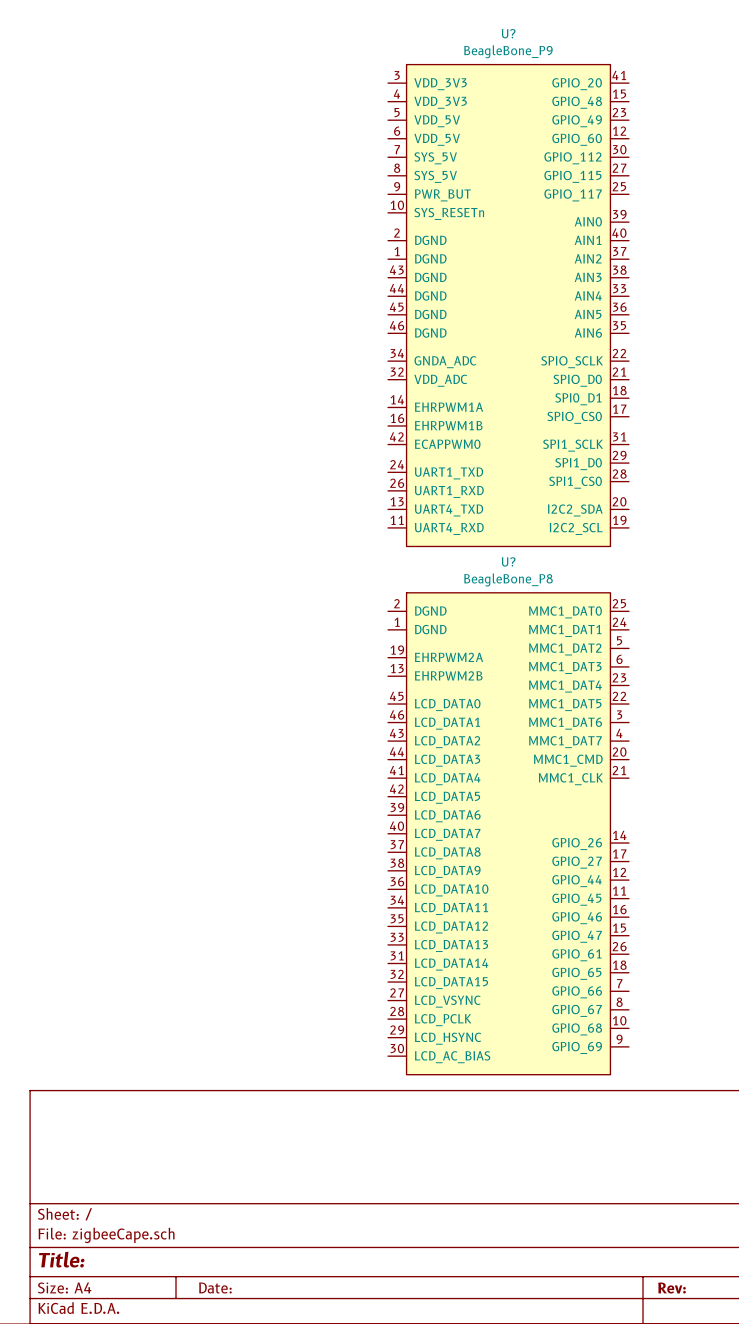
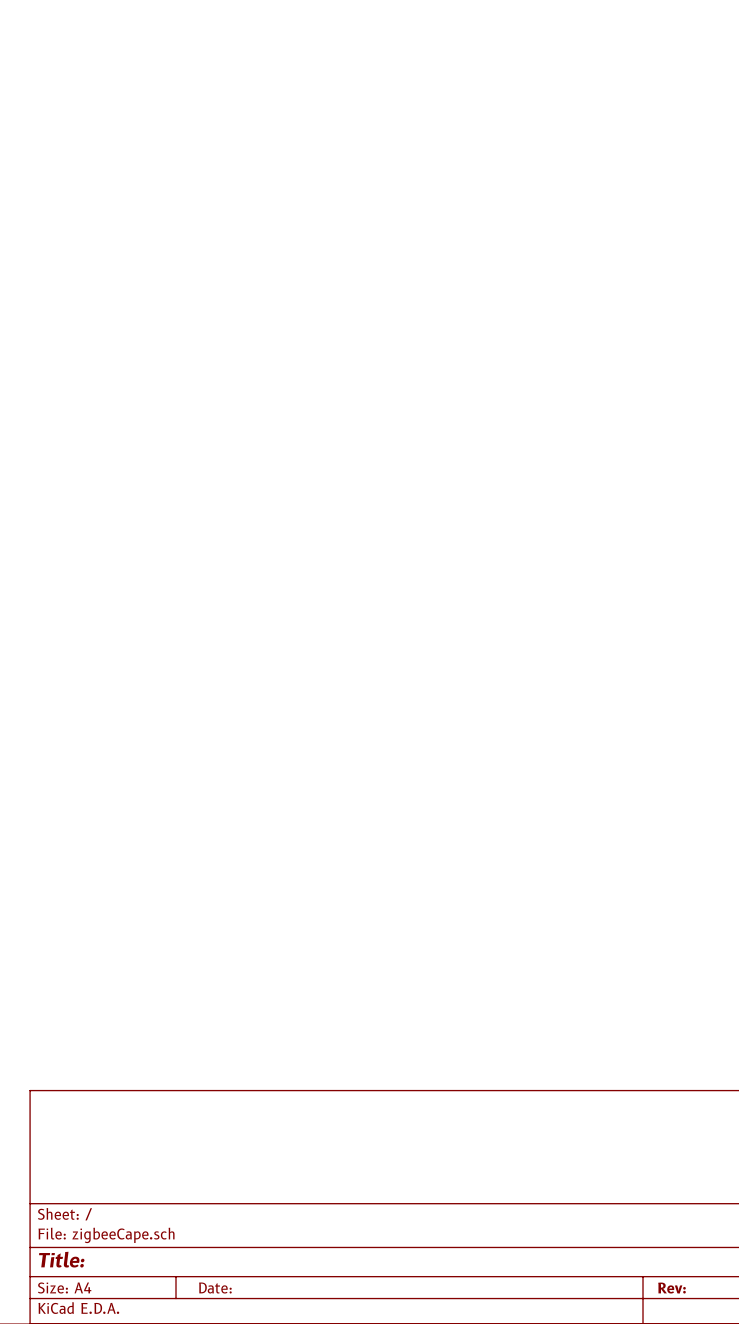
U?: BeagleBone_P9 (508, 305) -> none
U?: BeagleBone_P8 (508, 833) -> none

